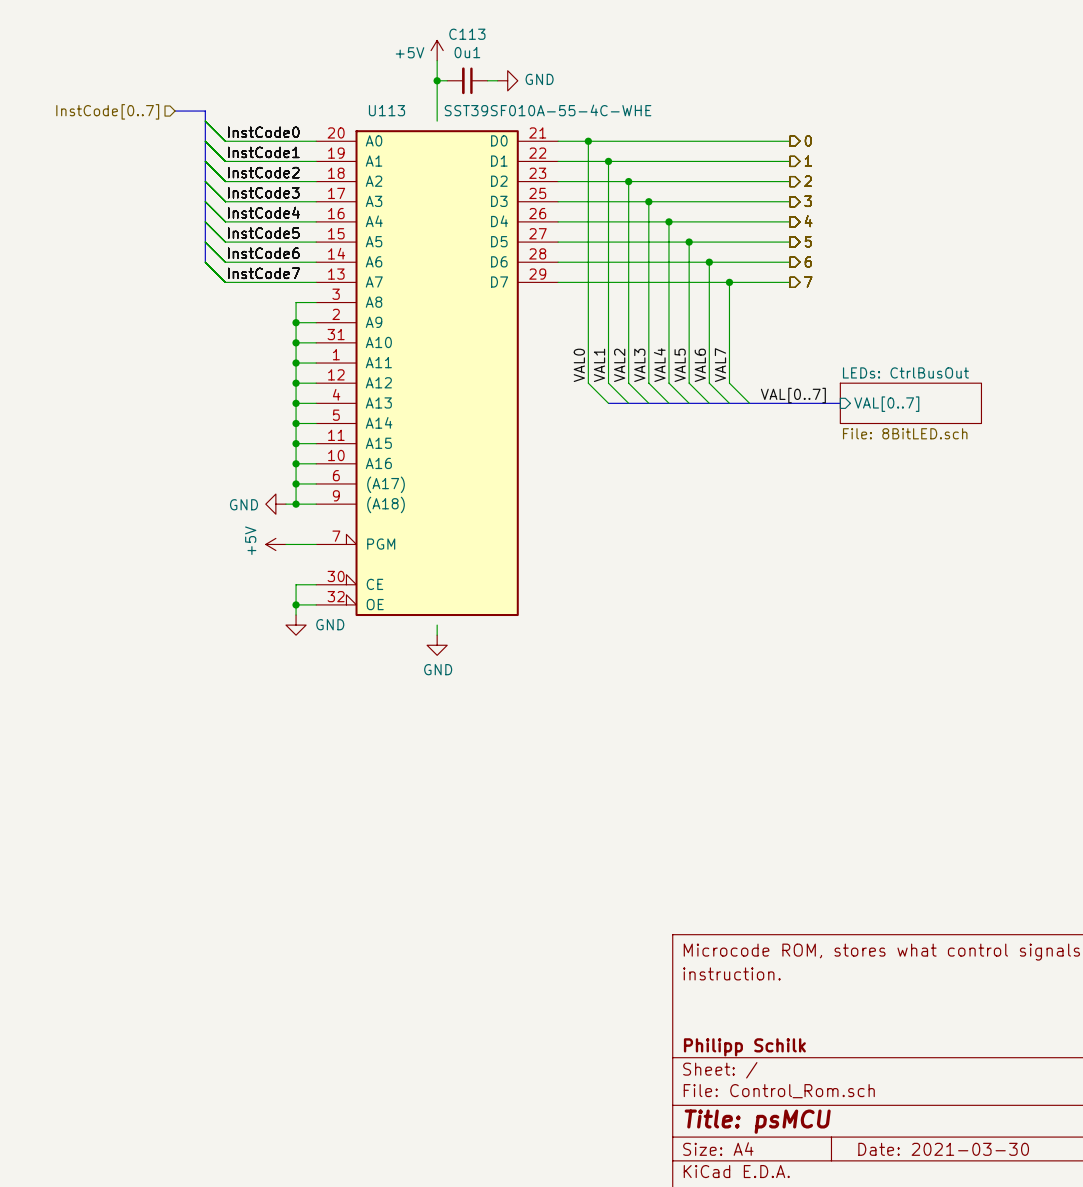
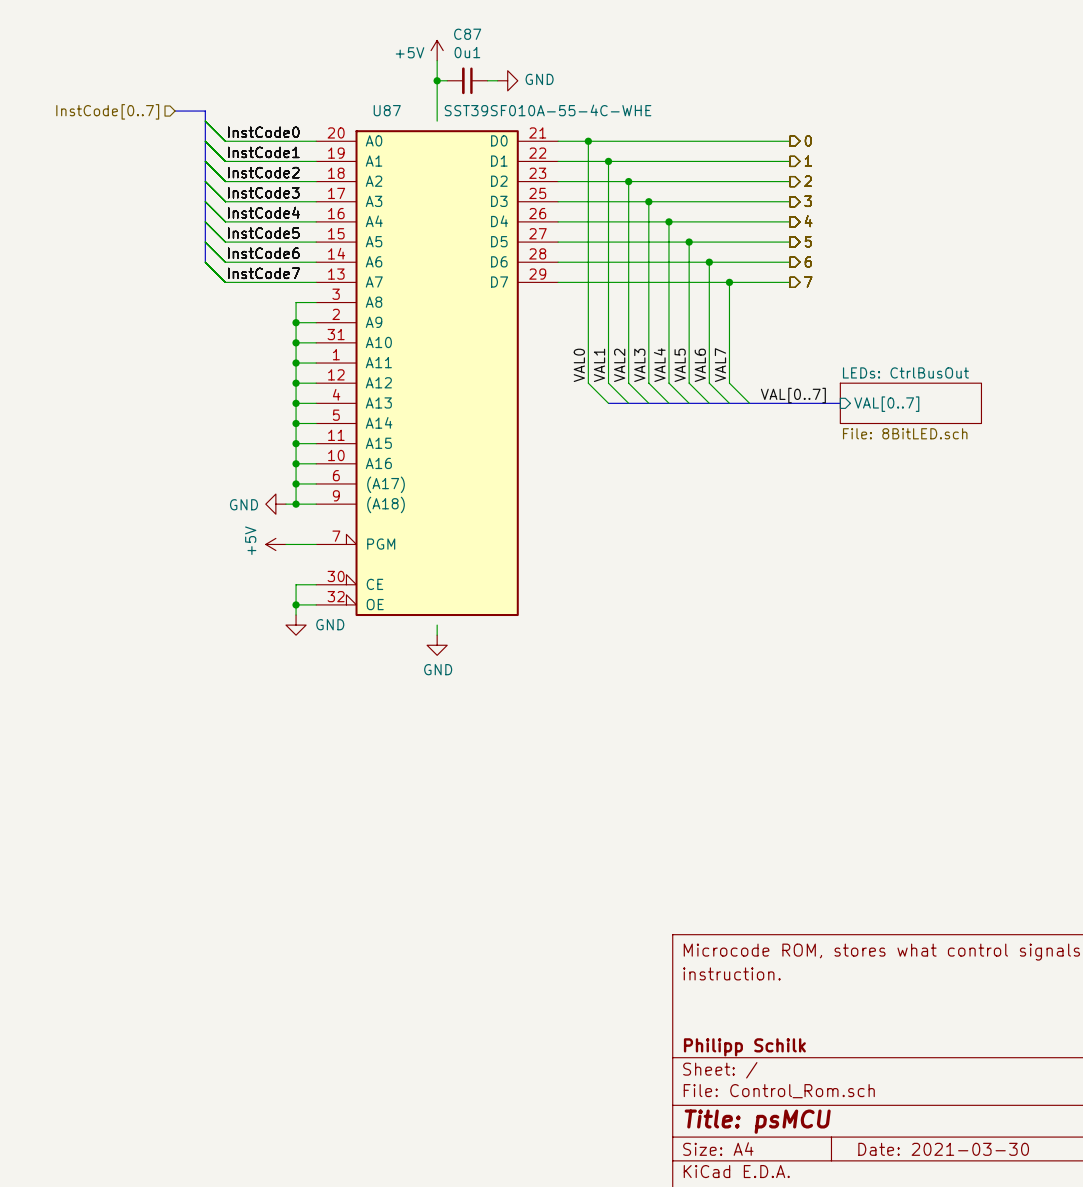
C113 name: C113 (467, 34) -> C87 (467, 34)
U113 name: U113 (387, 110) -> U87 (387, 110)

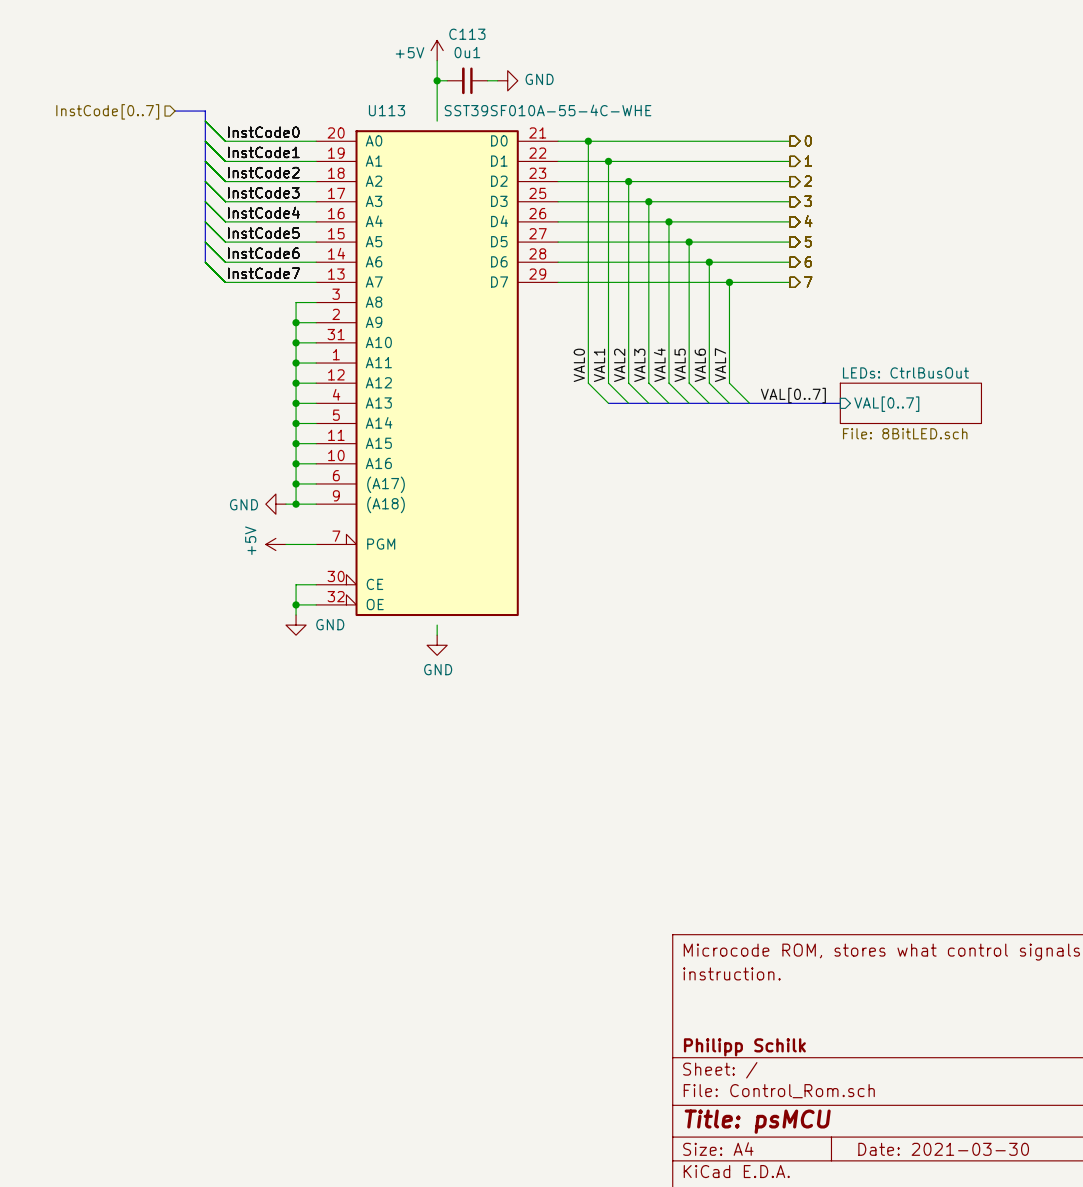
C87 name: C87 (467, 34) -> C113 (467, 34)
U87 name: U87 (387, 110) -> U113 (387, 110)

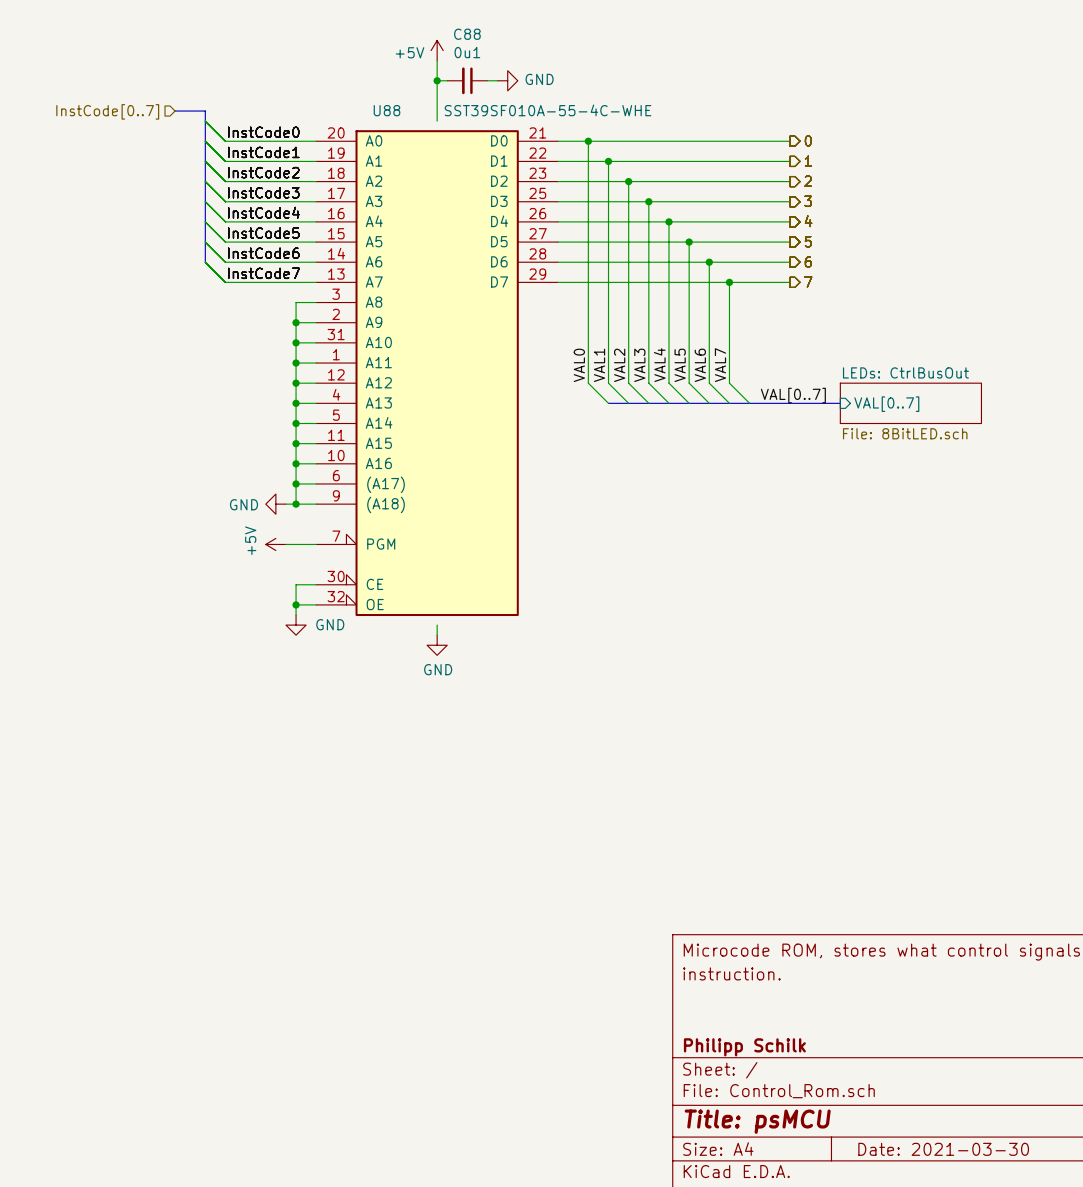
C113 name: C113 (467, 34) -> C88 (467, 34)
U113 name: U113 (387, 110) -> U88 (387, 110)

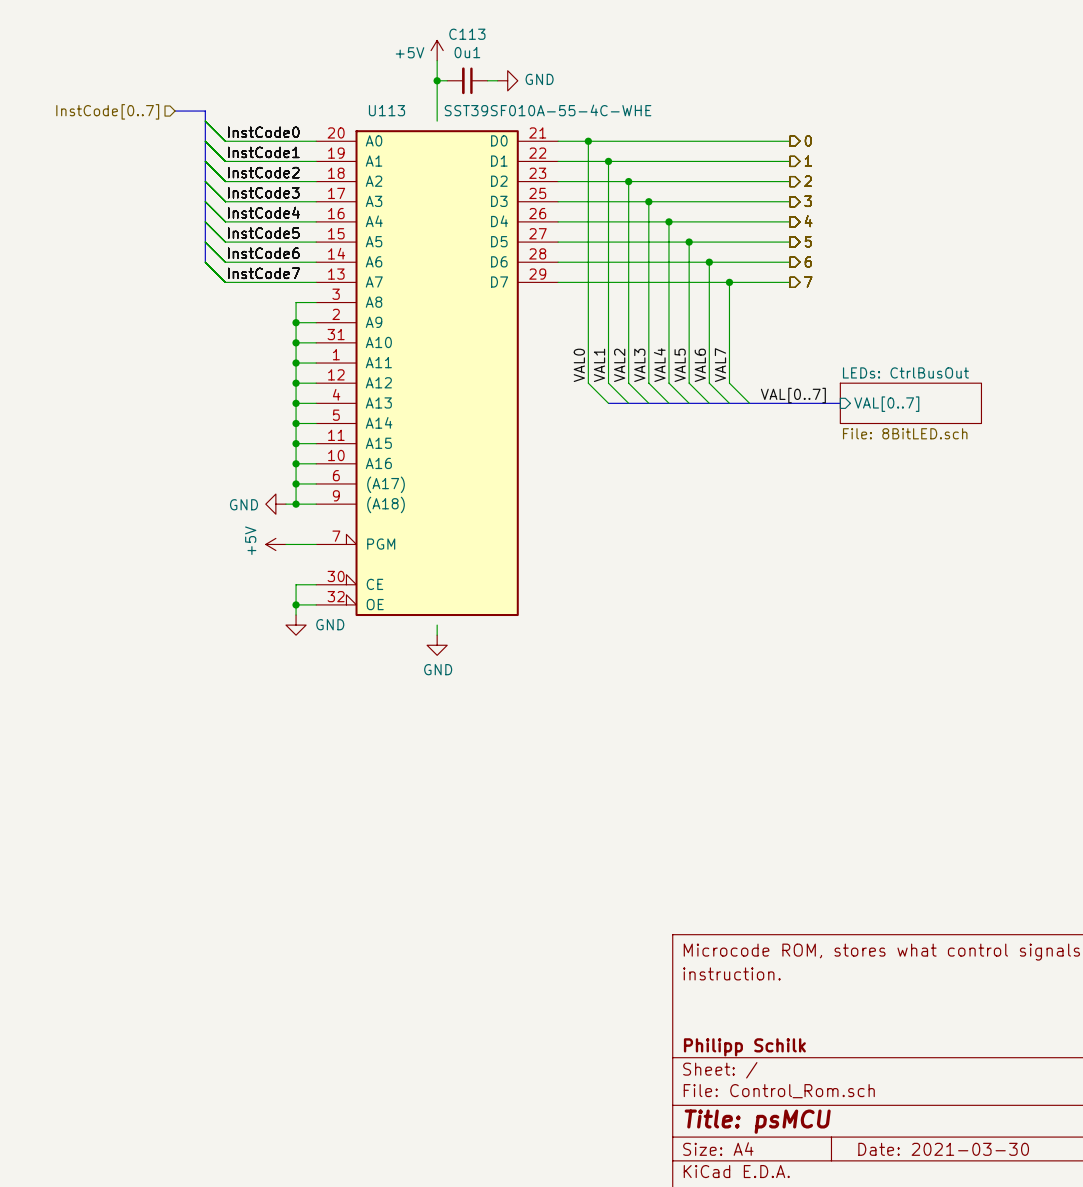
C88 name: C88 (467, 34) -> C113 (467, 34)
U88 name: U88 (387, 110) -> U113 (387, 110)

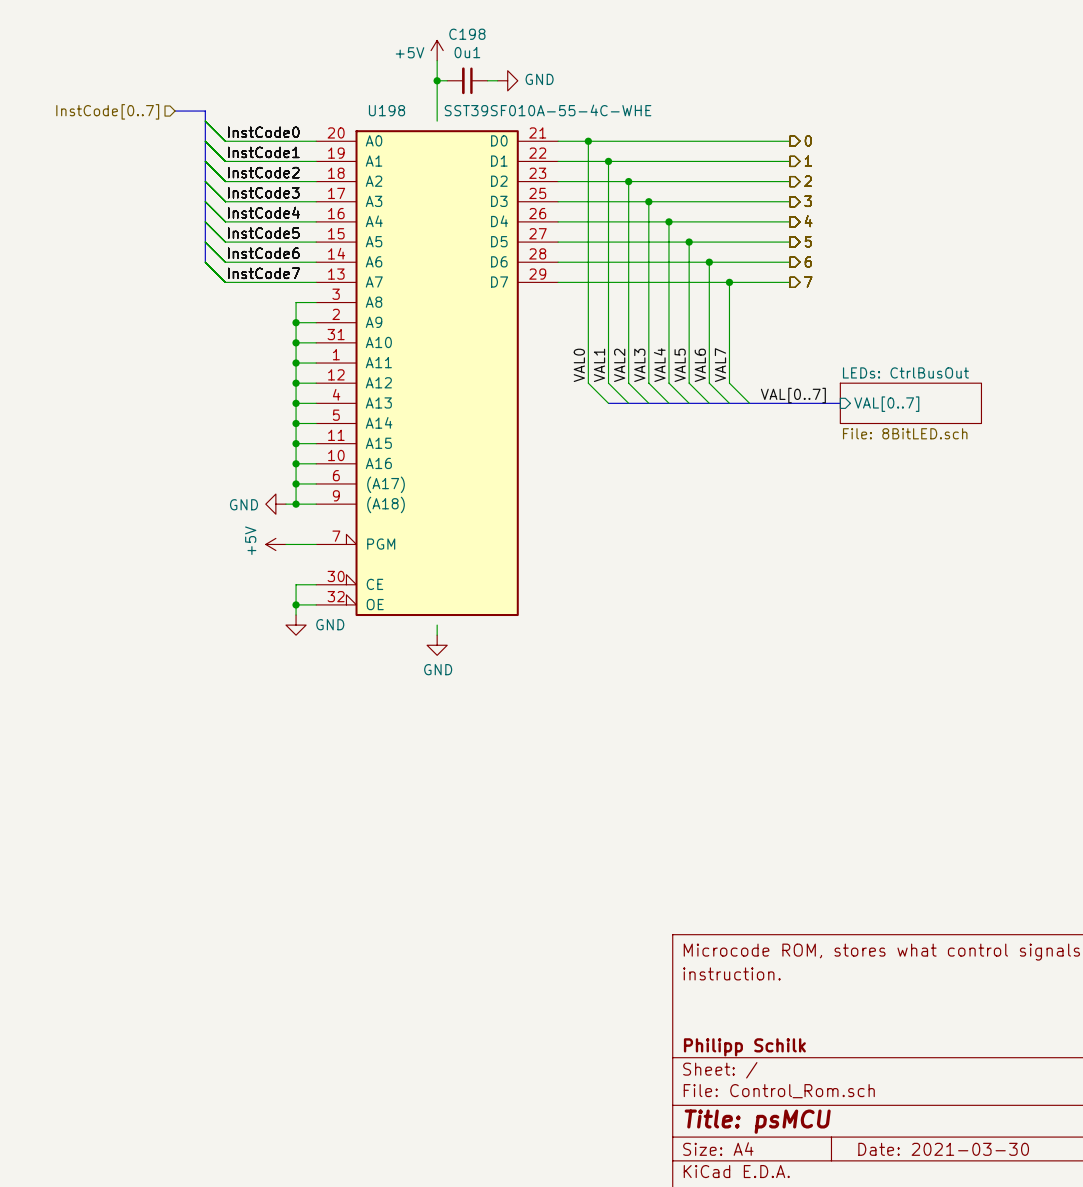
C113 name: C113 (467, 34) -> C198 (467, 34)
U113 name: U113 (387, 110) -> U198 (387, 110)

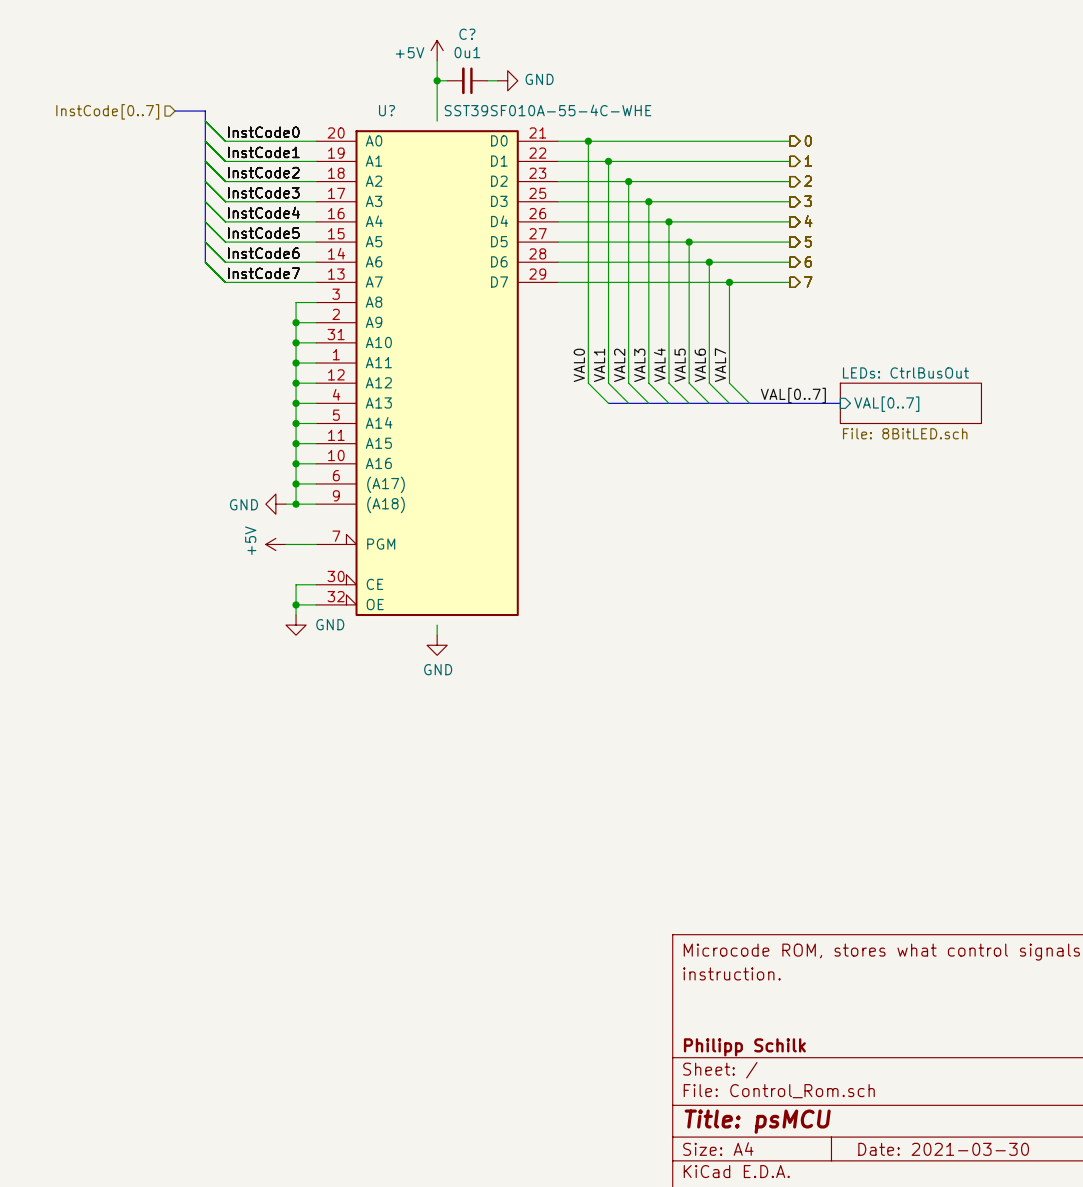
C198 name: C198 (467, 34) -> C? (467, 34)
U198 name: U198 (387, 110) -> U? (387, 110)

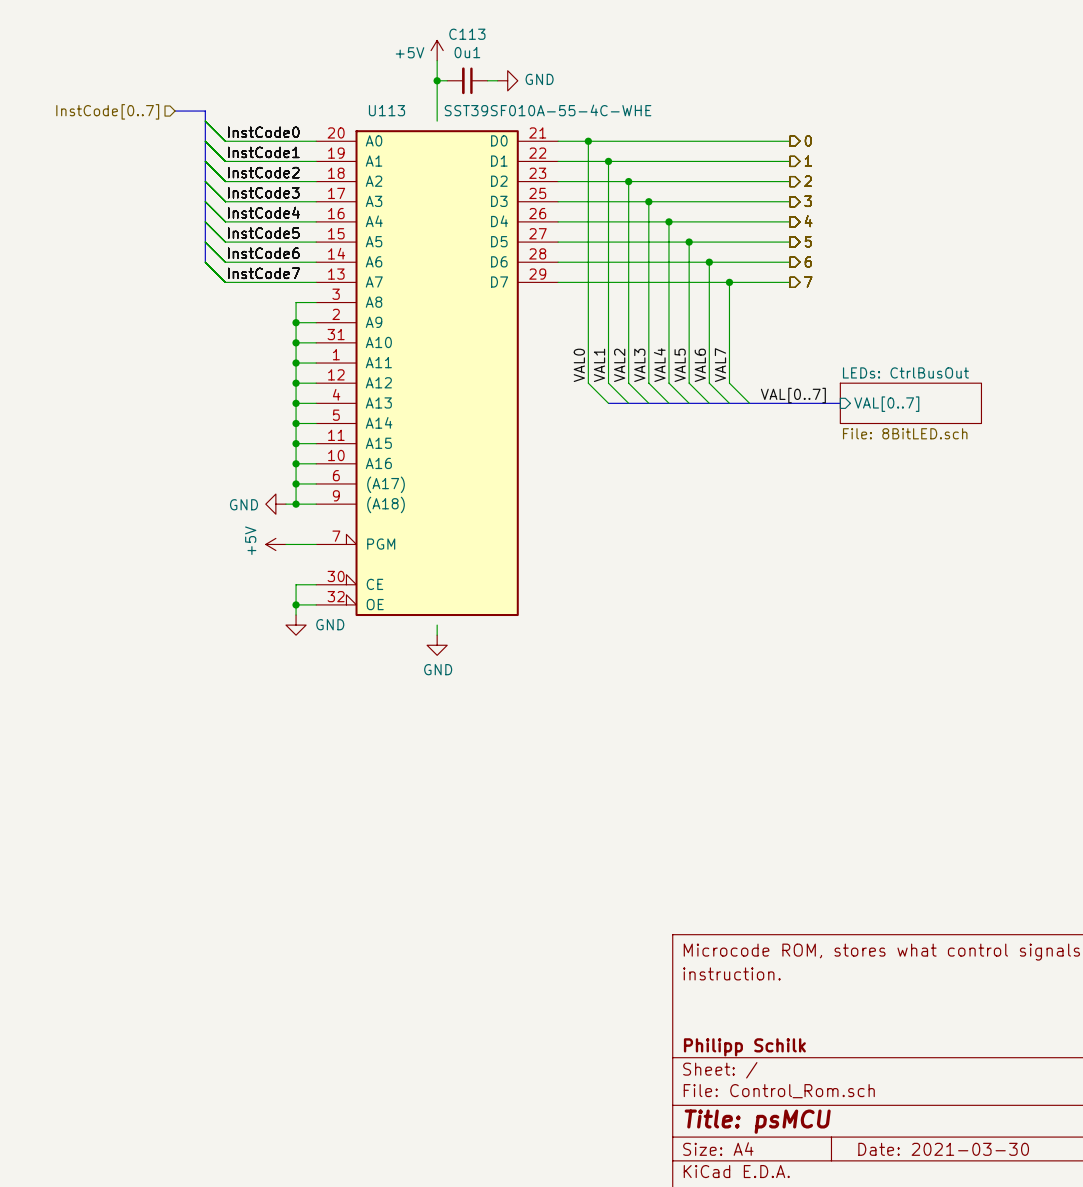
C? name: C? (467, 34) -> C113 (467, 34)
U? name: U? (387, 110) -> U113 (387, 110)

